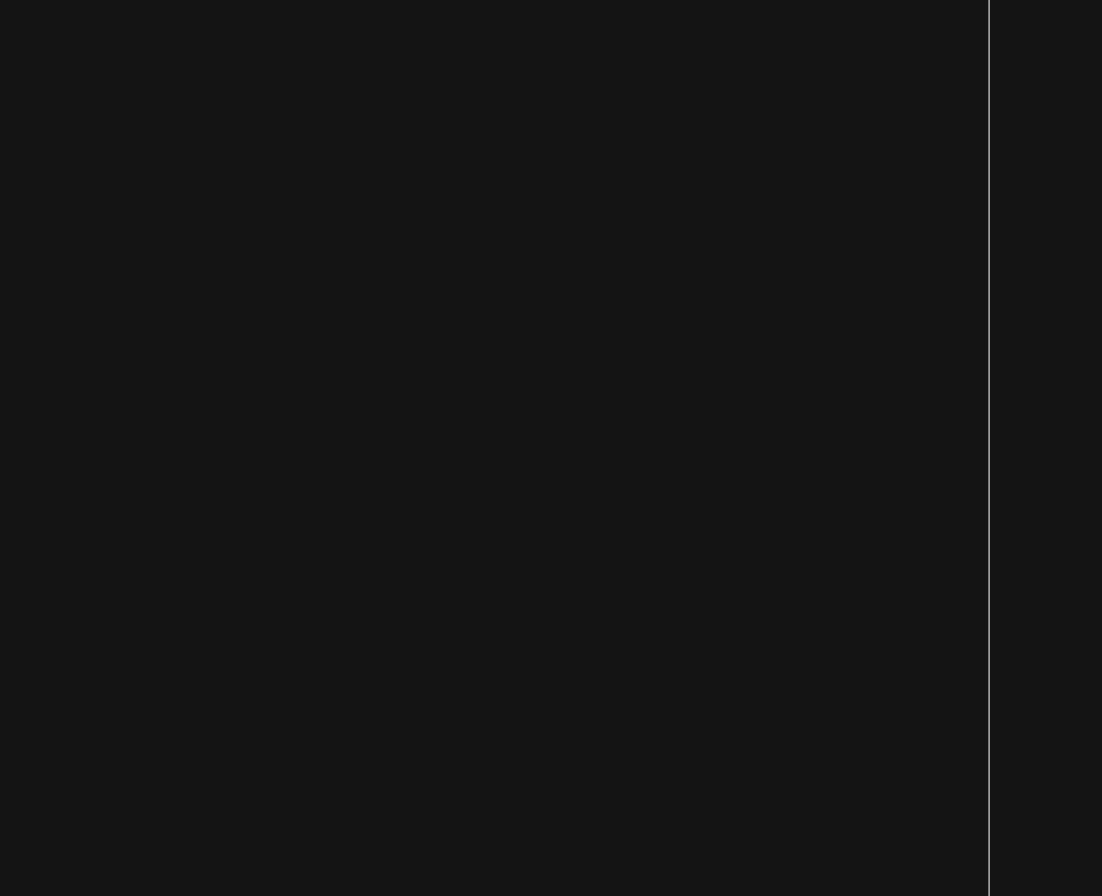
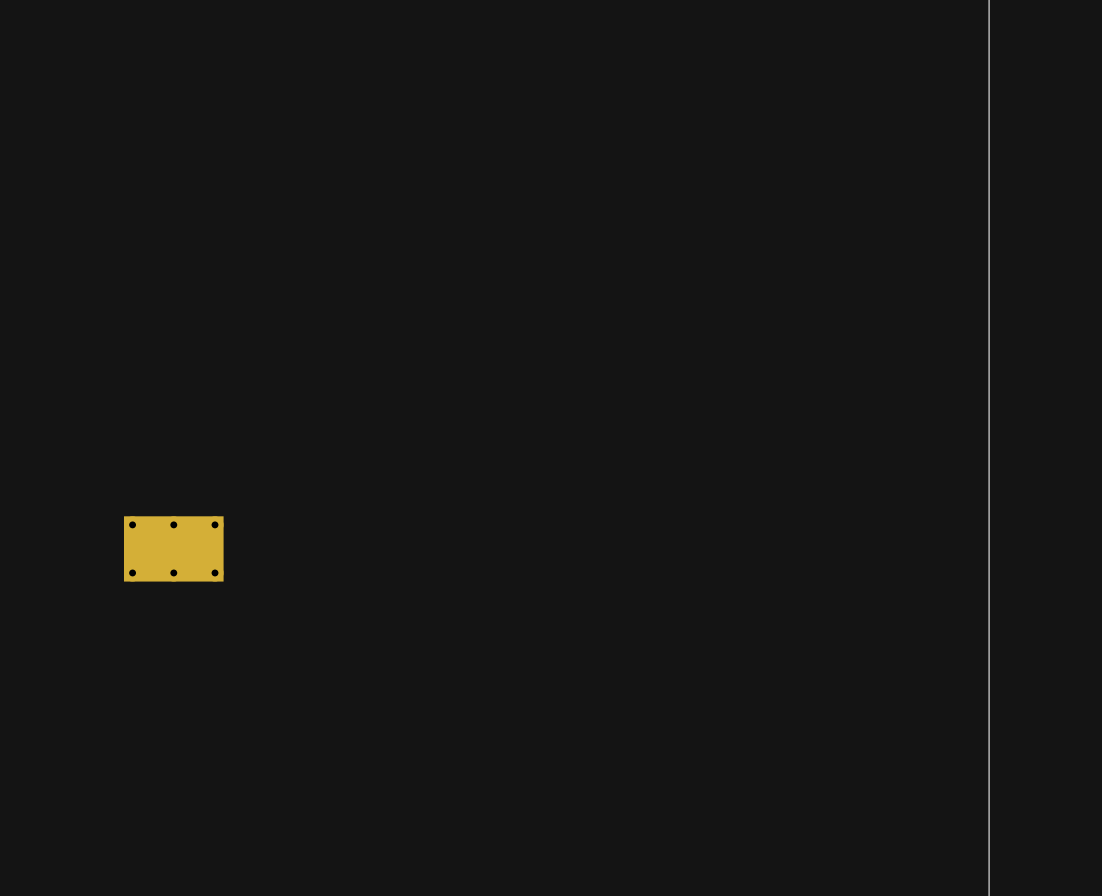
part: none -> (173, 548)

